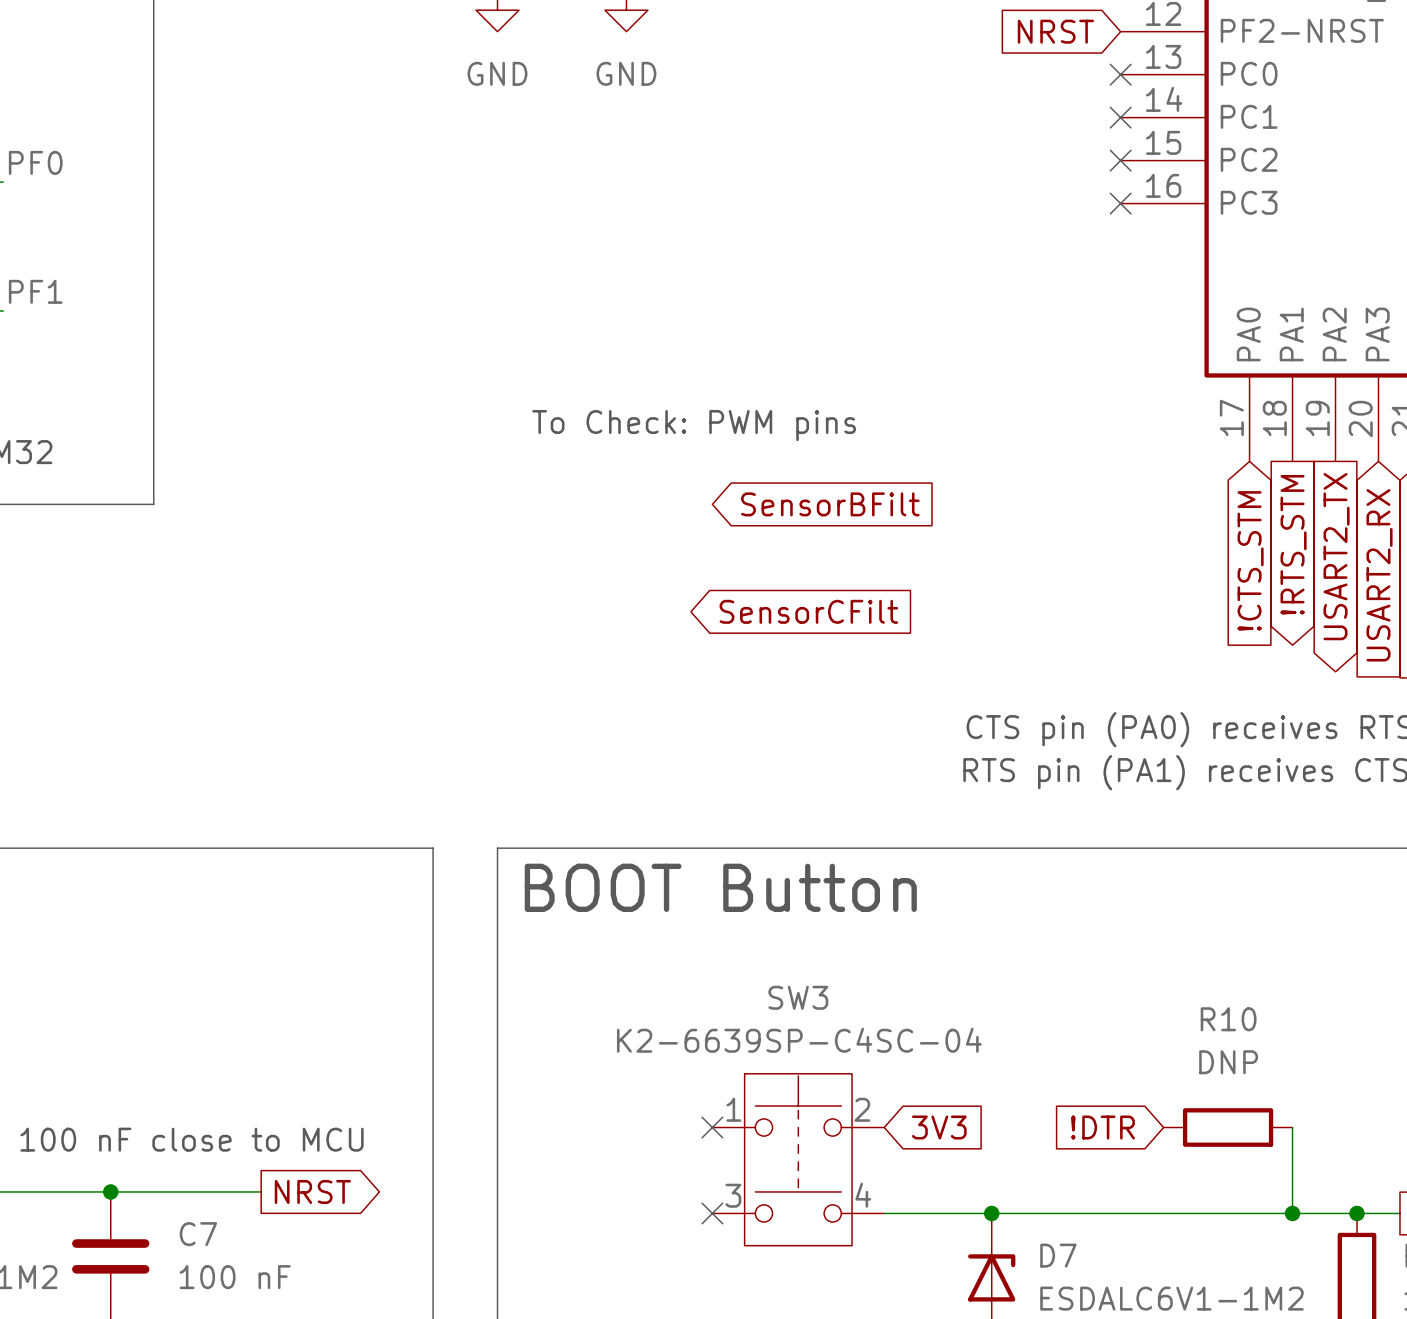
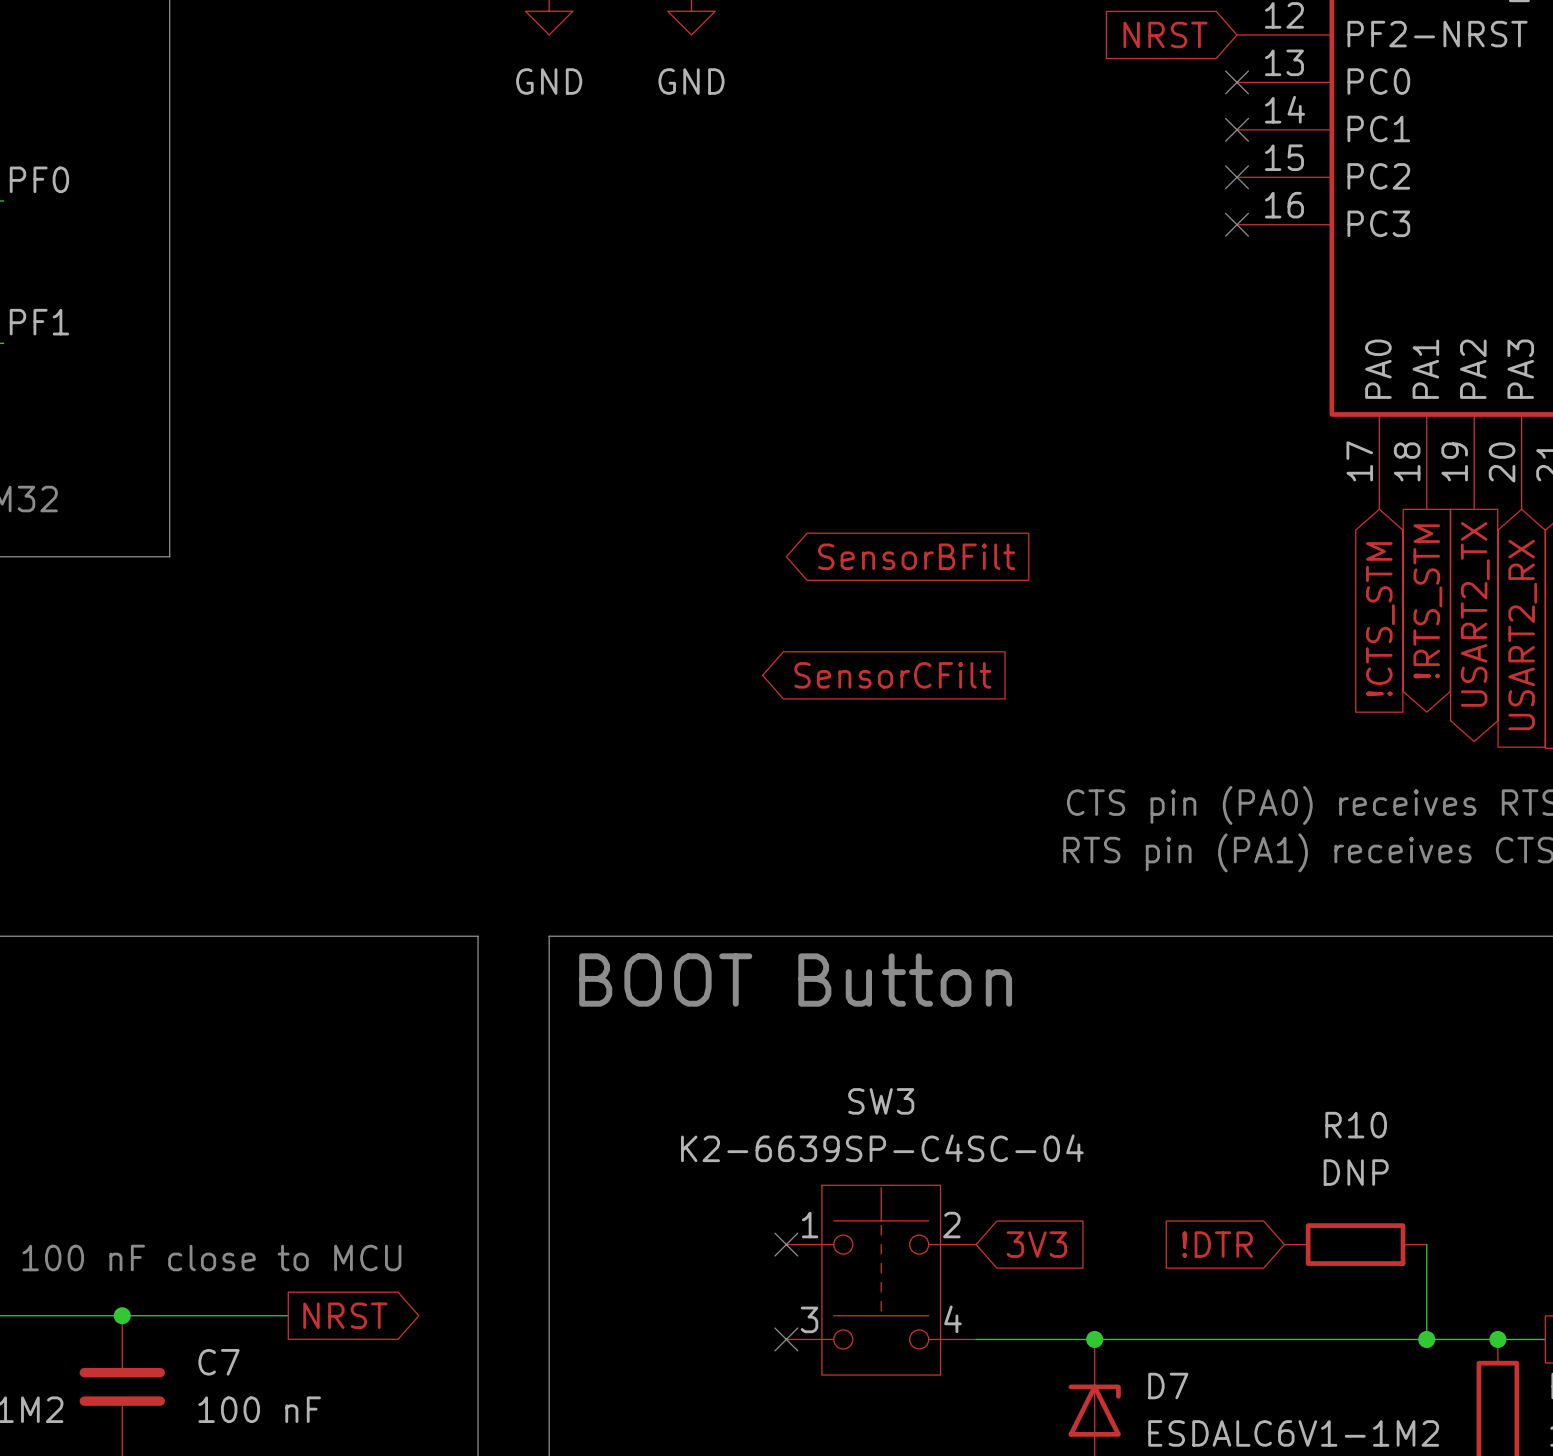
text: To Check: PWM pins (694, 425) -> none

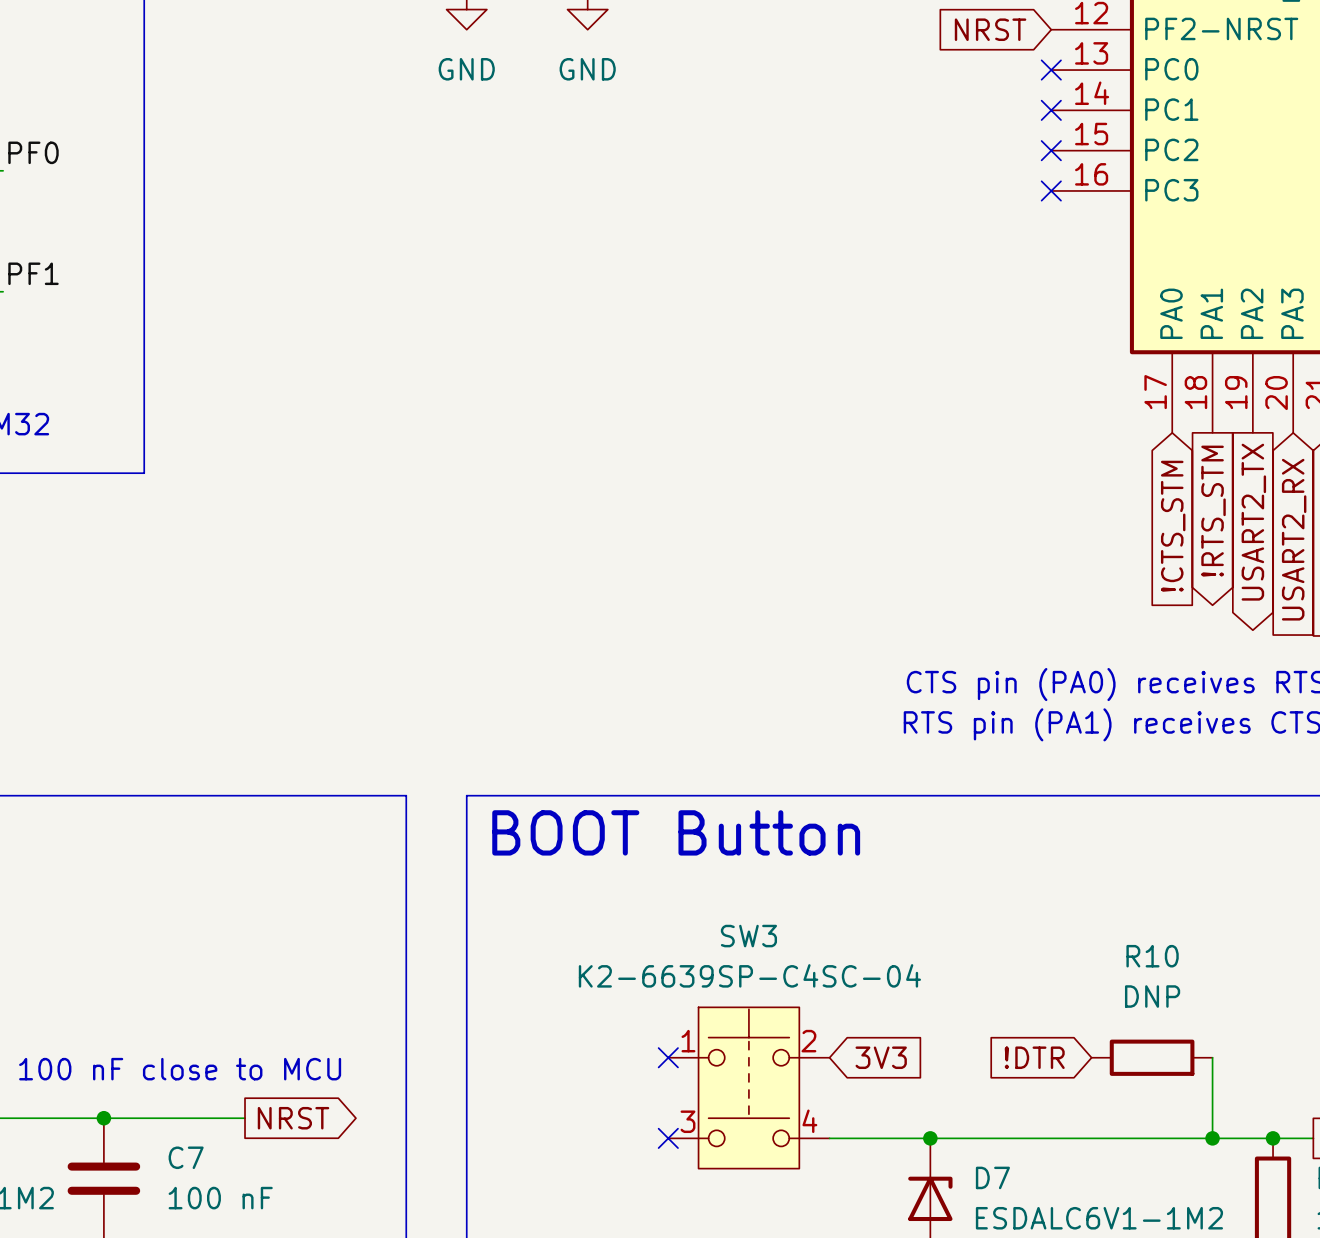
global label: SensorBFilt (916, 556) -> none
global label: SensorCFilt (892, 675) -> none

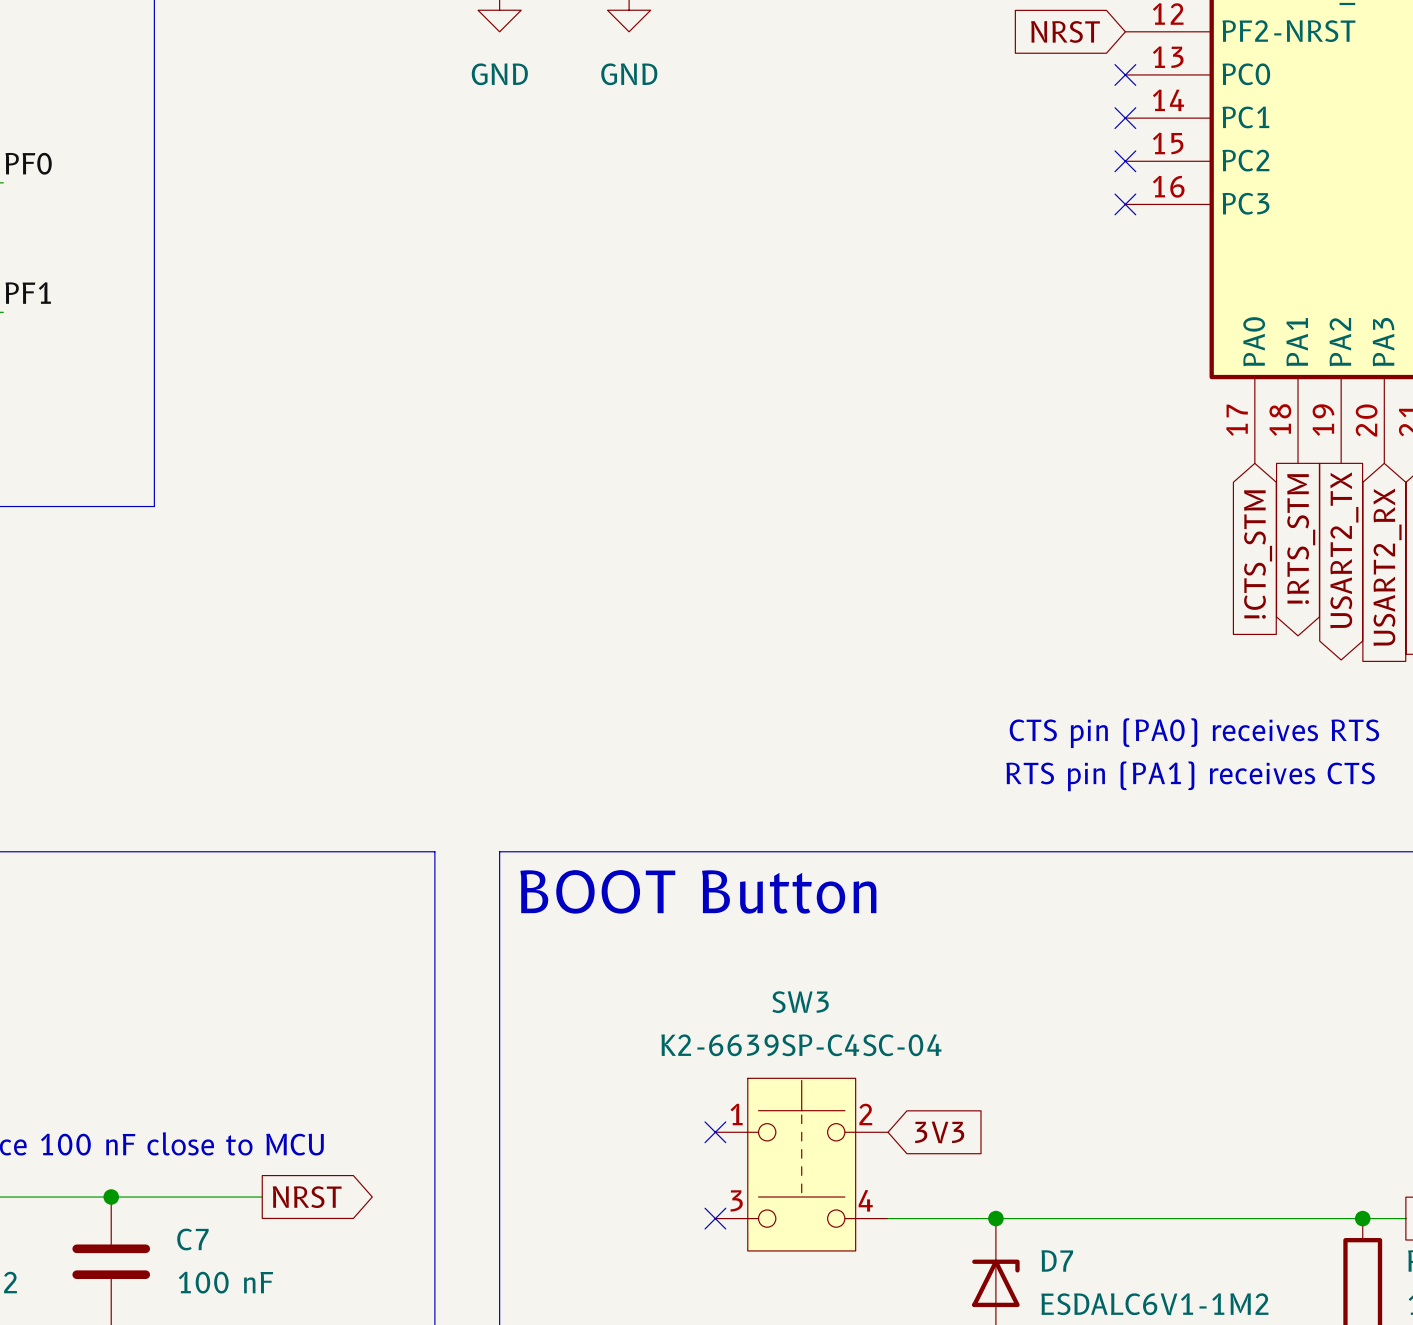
global label: !DTR (1034, 1057) -> none
R10: DNP (1152, 1057) -> none
wire: (1212, 1057) (1212, 1138) -> none
junction: (1212, 1138) -> none

